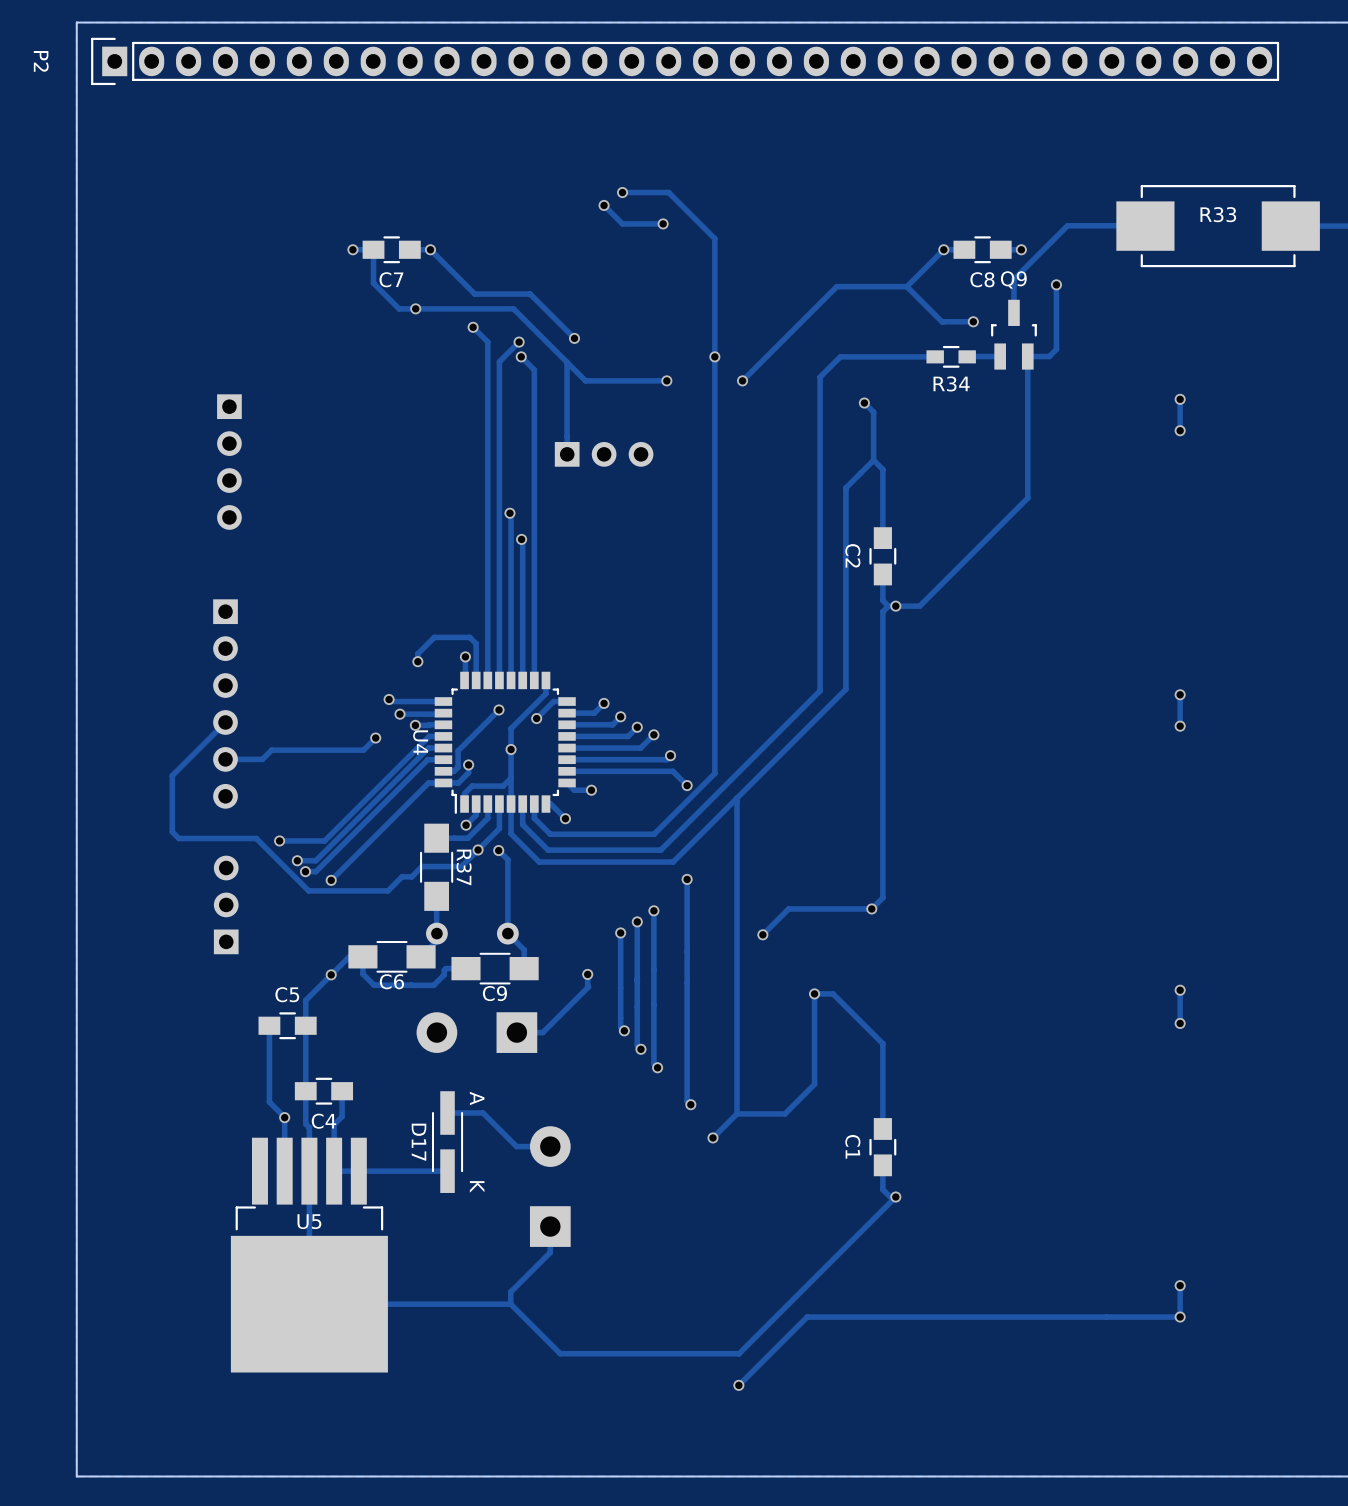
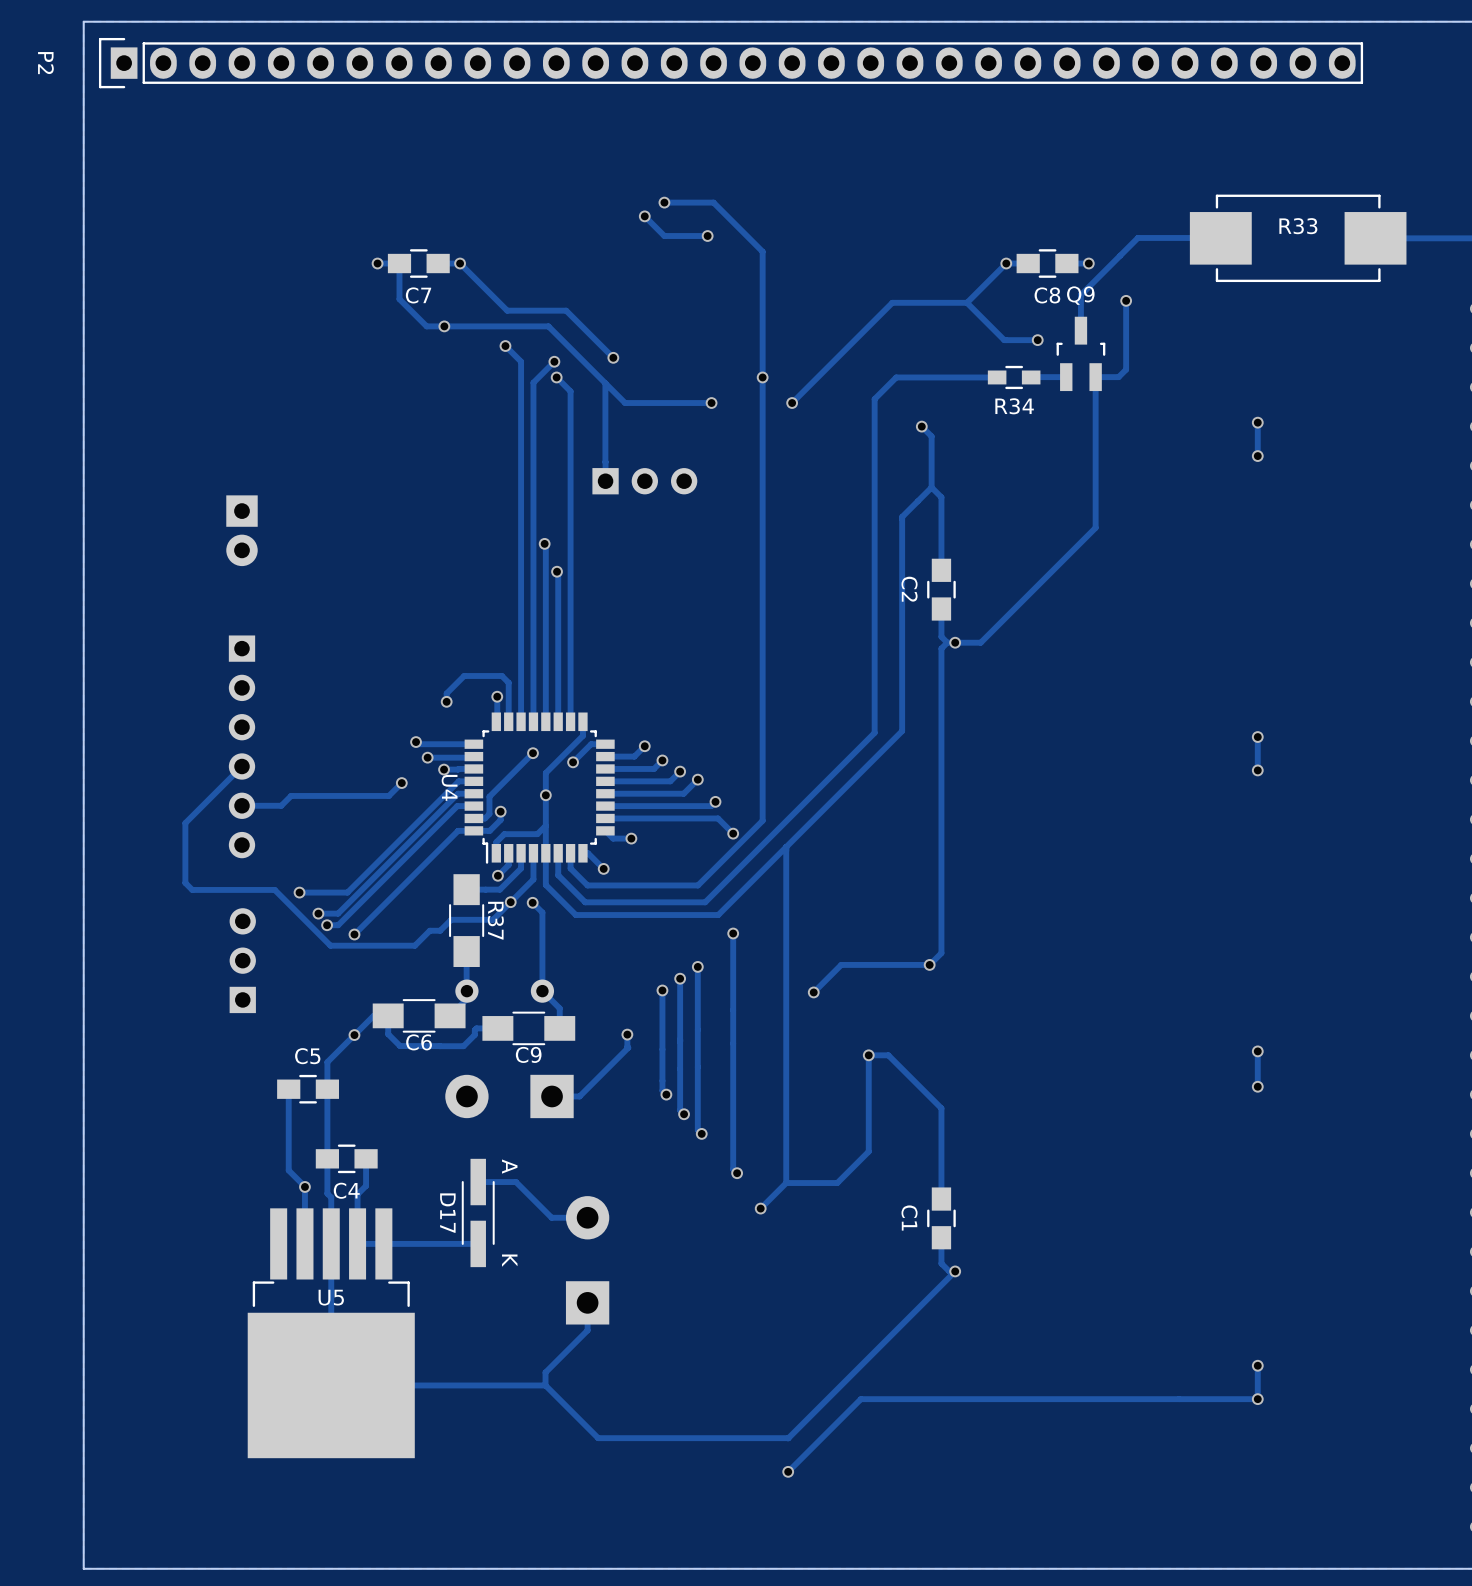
part: (229, 462) -> none
part: none -> (241, 530)

